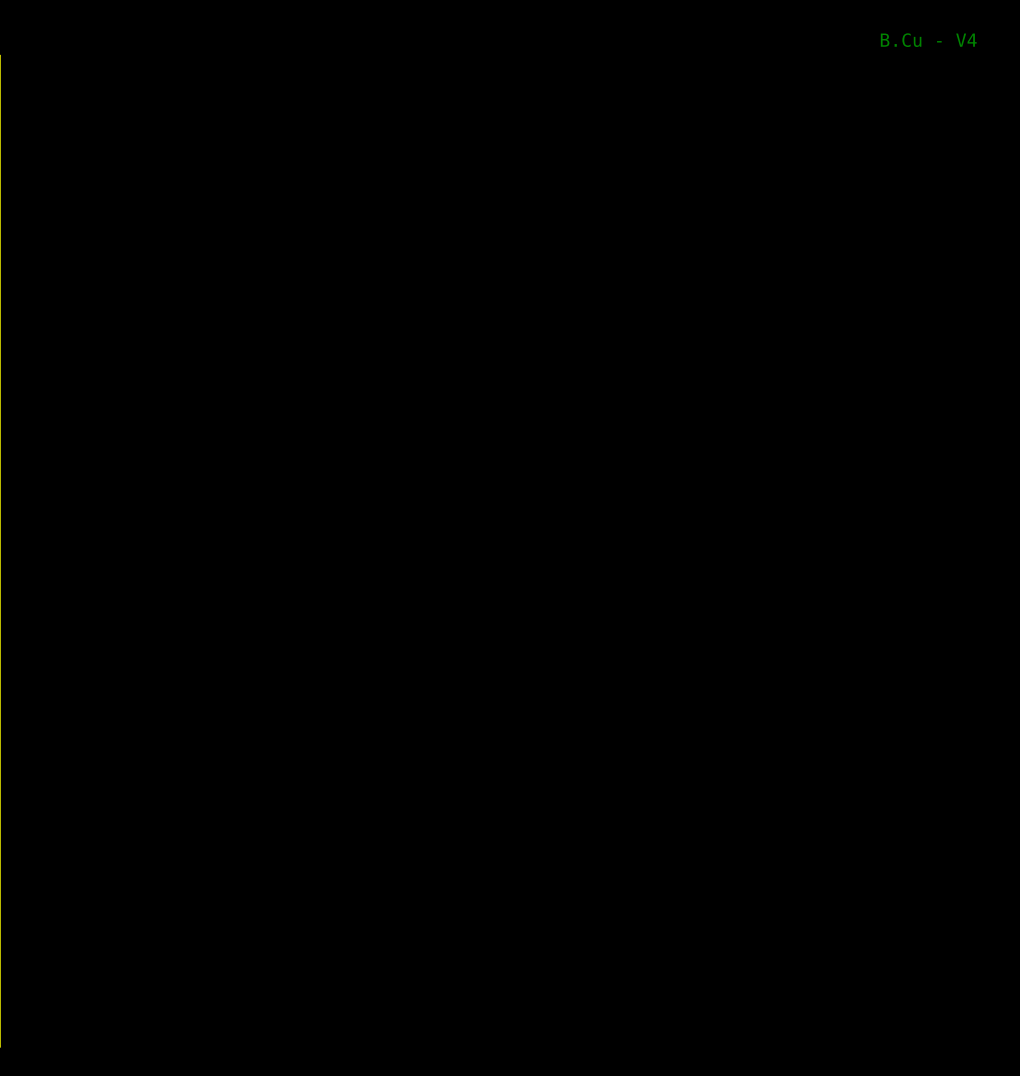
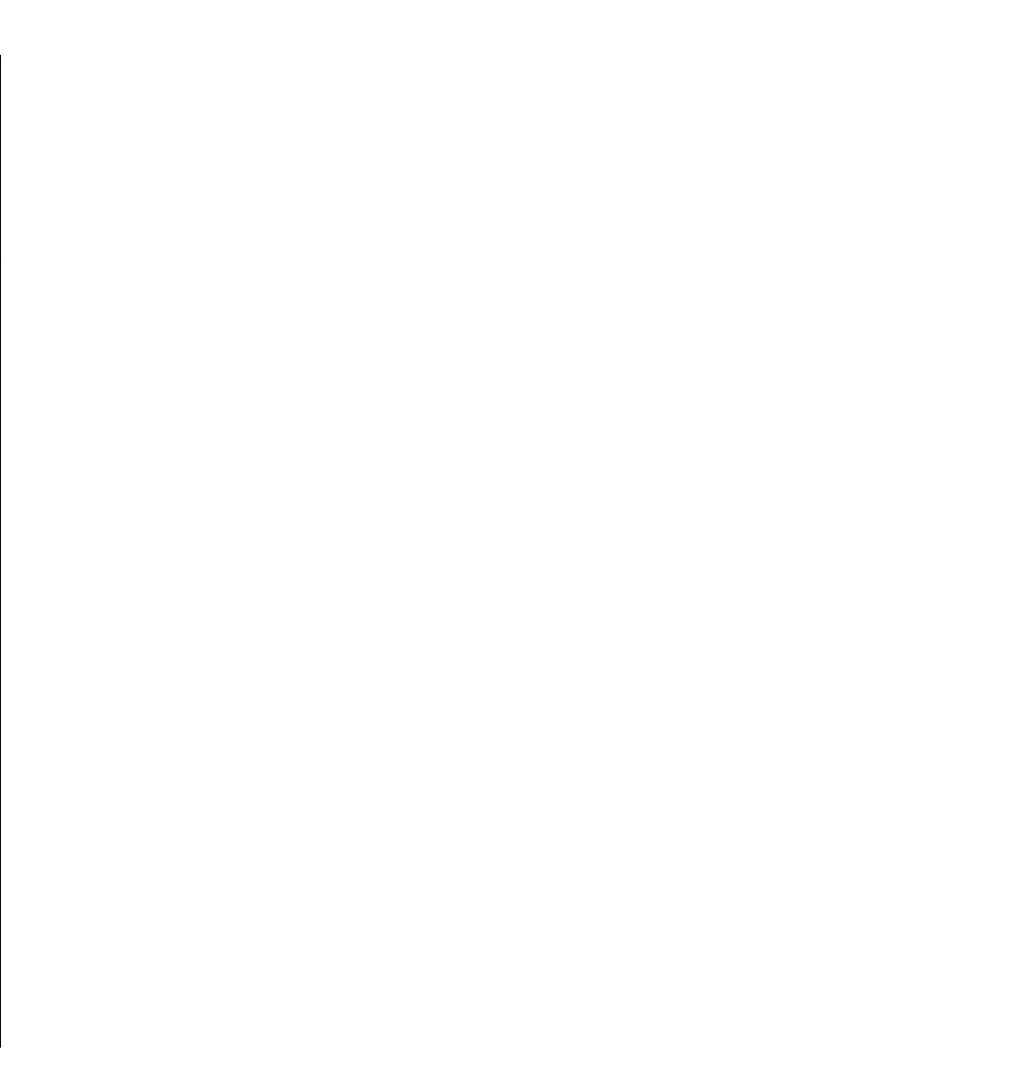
text: B.Cu - V4 (928, 40) -> none

